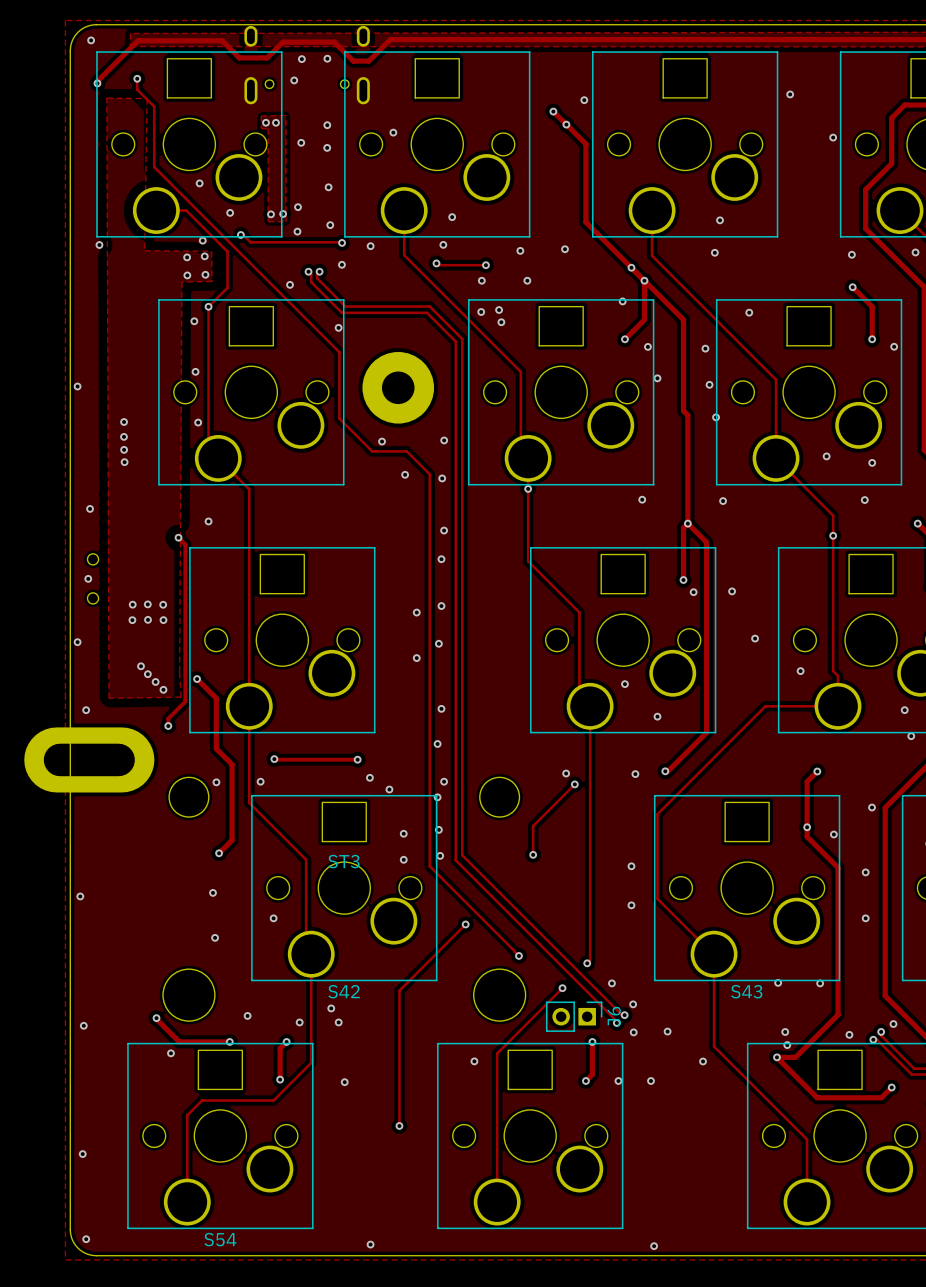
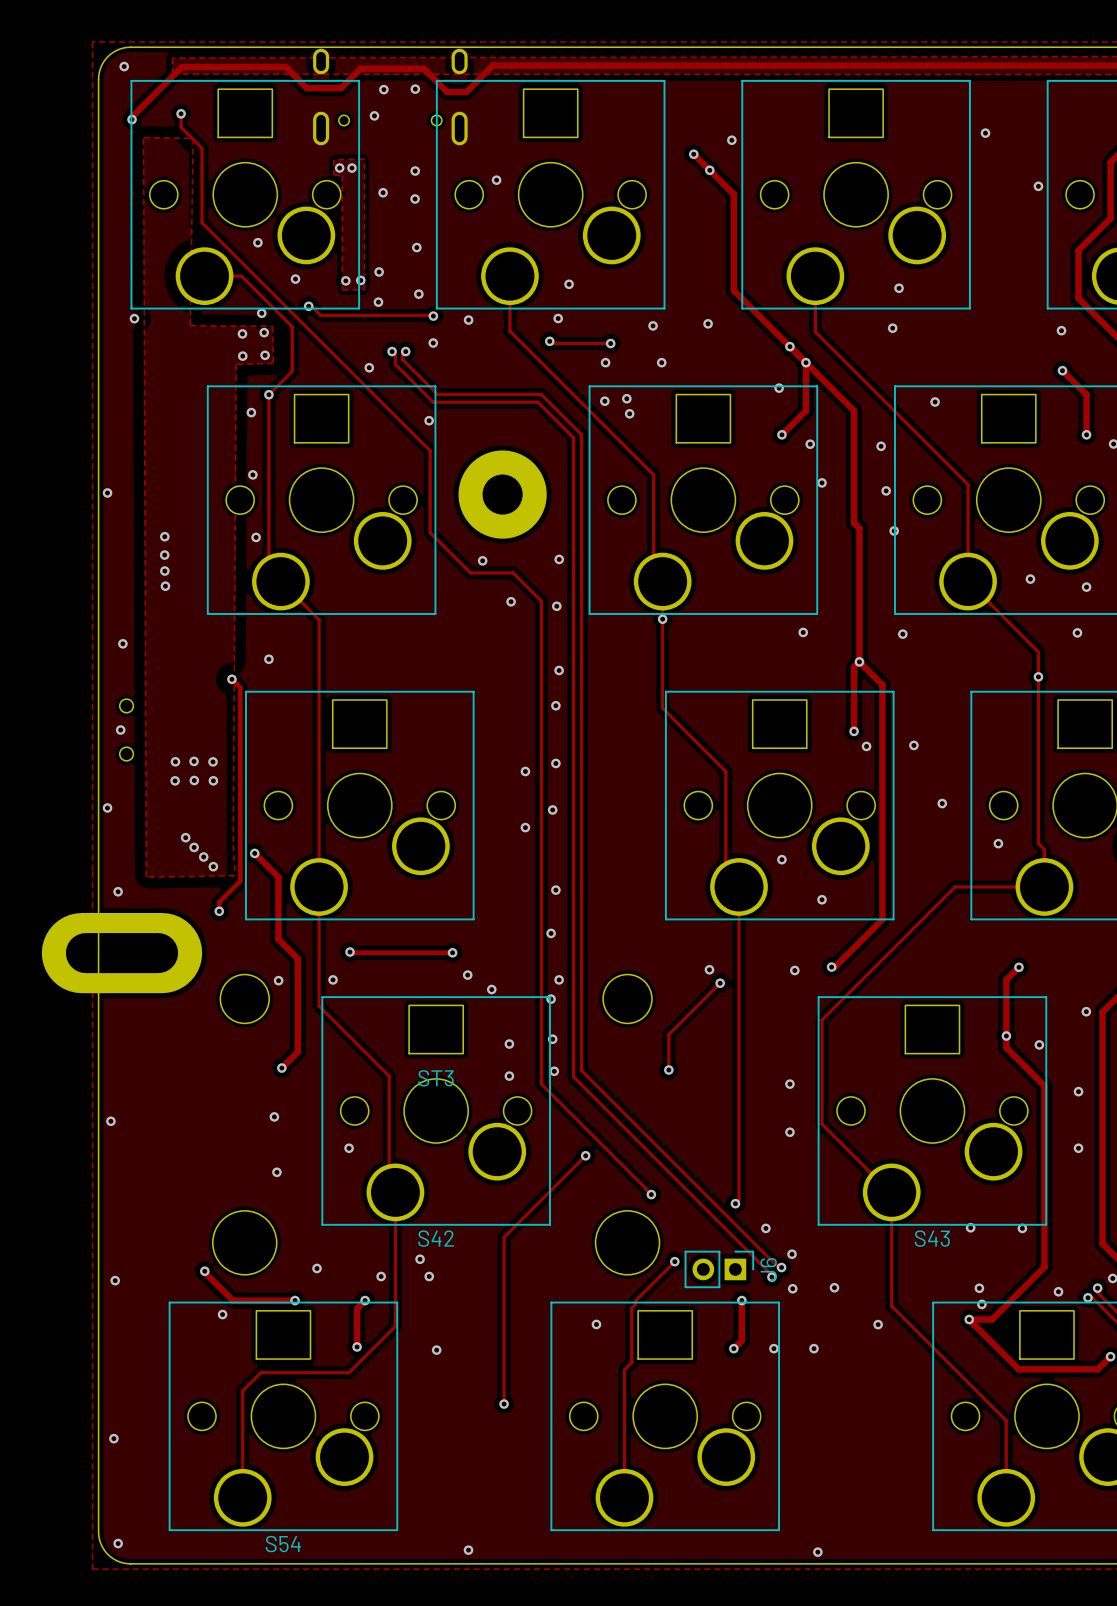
track: (562, 988) (497, 1053) (497, 1098) -> (674, 1261) (635, 1300) (635, 1304) (631, 1308) (632, 1362) (624, 1369)
via position: (562, 988) -> (674, 1261)

